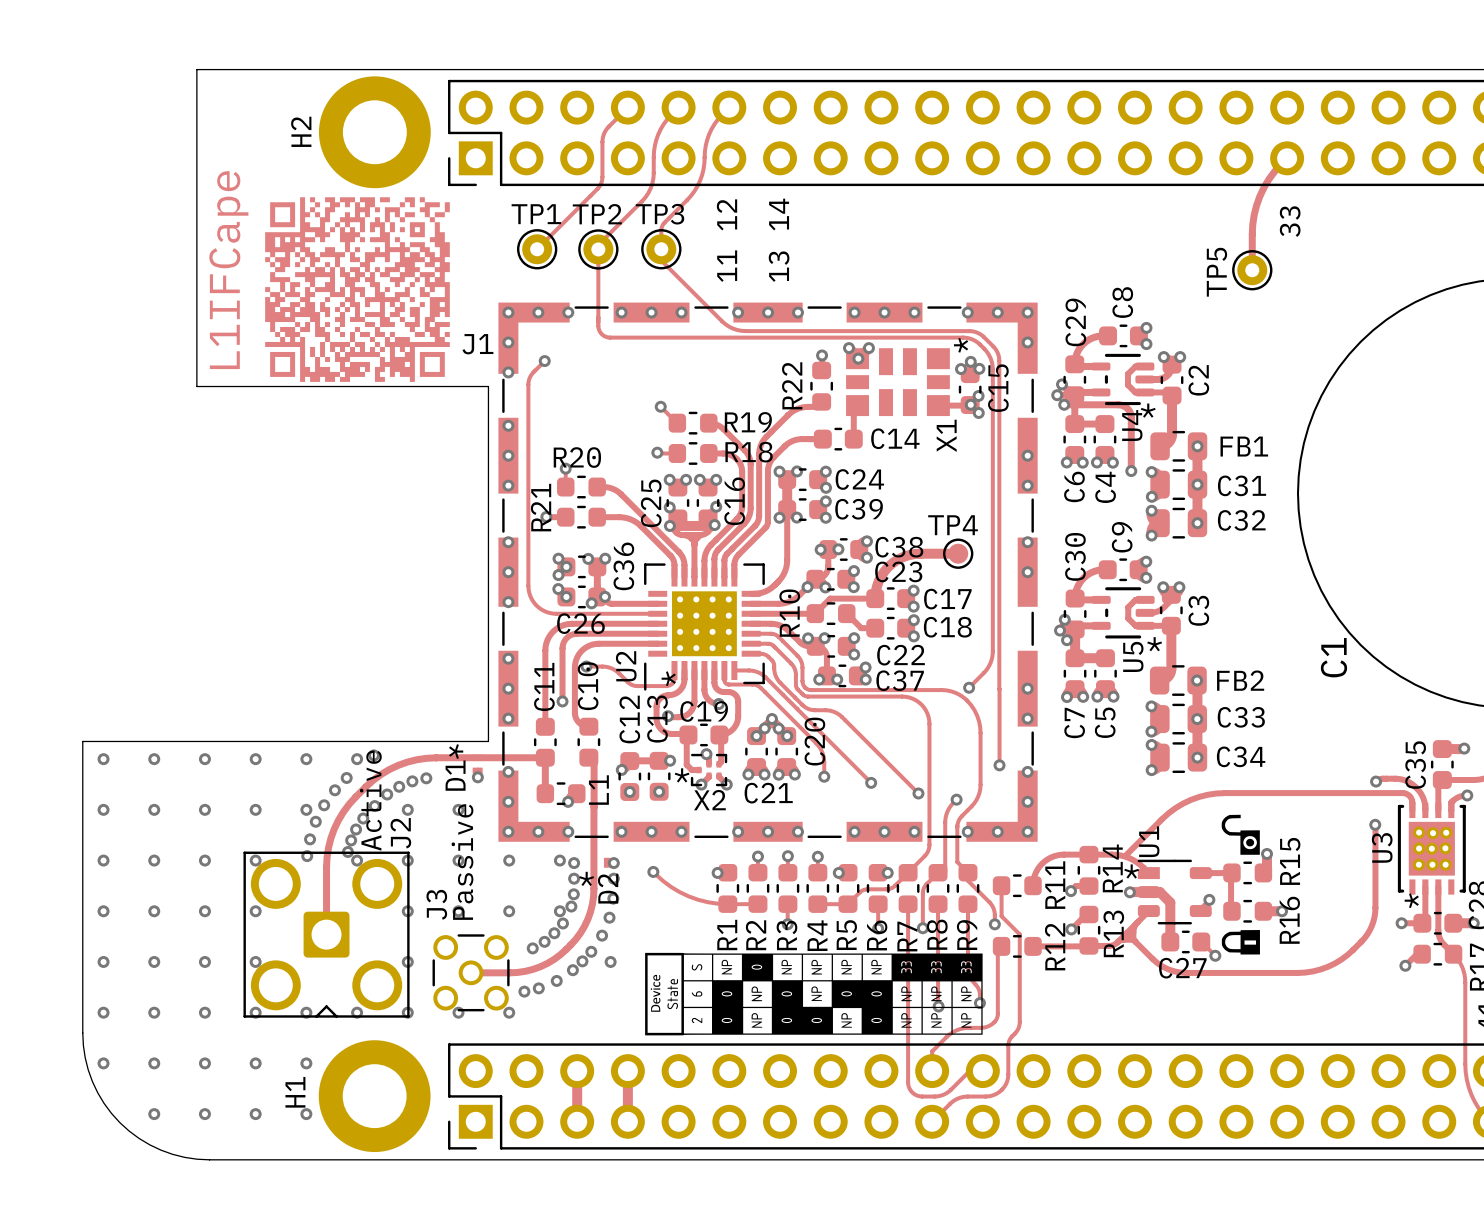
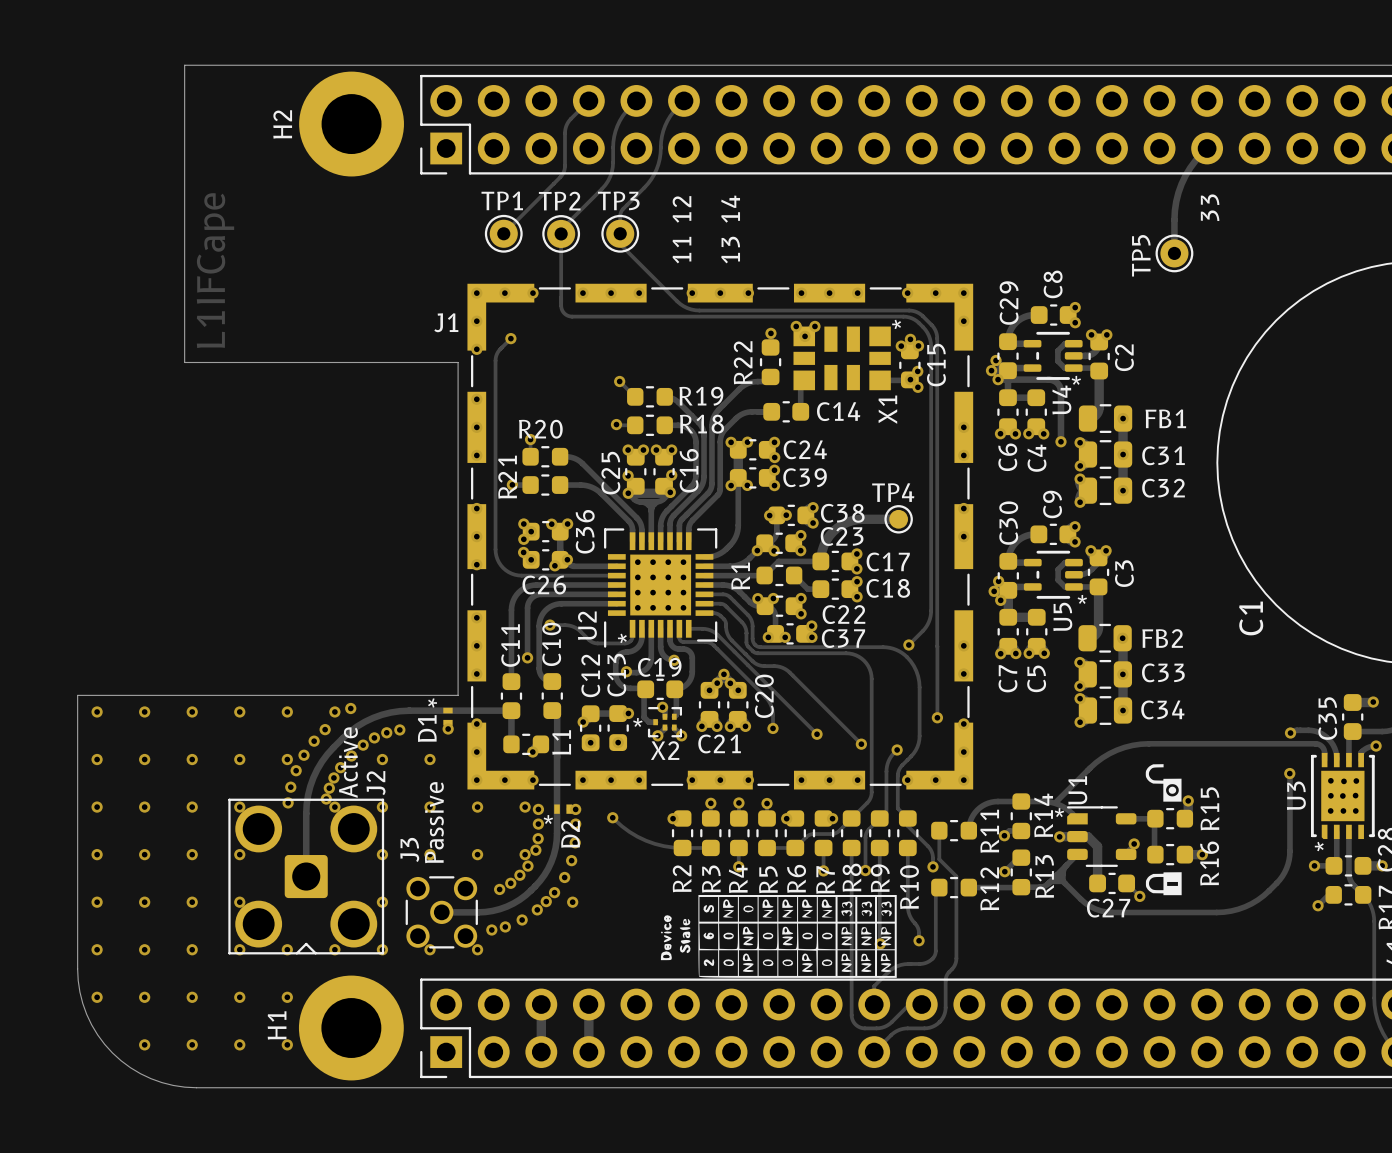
part: (357, 289) -> none
R10 name: R10 (789, 613) -> R1 (740, 576)
R8 name: R8 (937, 934) -> R9 (880, 878)
R1 name: R1 (727, 935) -> R2 (682, 878)
R2 name: R2 (756, 935) -> R3 (711, 879)
R3 name: R3 (786, 935) -> R4 (738, 879)
R4 name: R4 (817, 935) -> R5 (768, 879)
R5 name: R5 (846, 935) -> R6 (796, 878)
R6 name: R6 (877, 935) -> R7 (825, 879)
R9 name: R9 (967, 935) -> R10 (909, 887)
R7 name: R7 (907, 936) -> R8 (852, 877)
drawing shape: [645, 952, 983, 1036] -> [660, 895, 897, 978]

